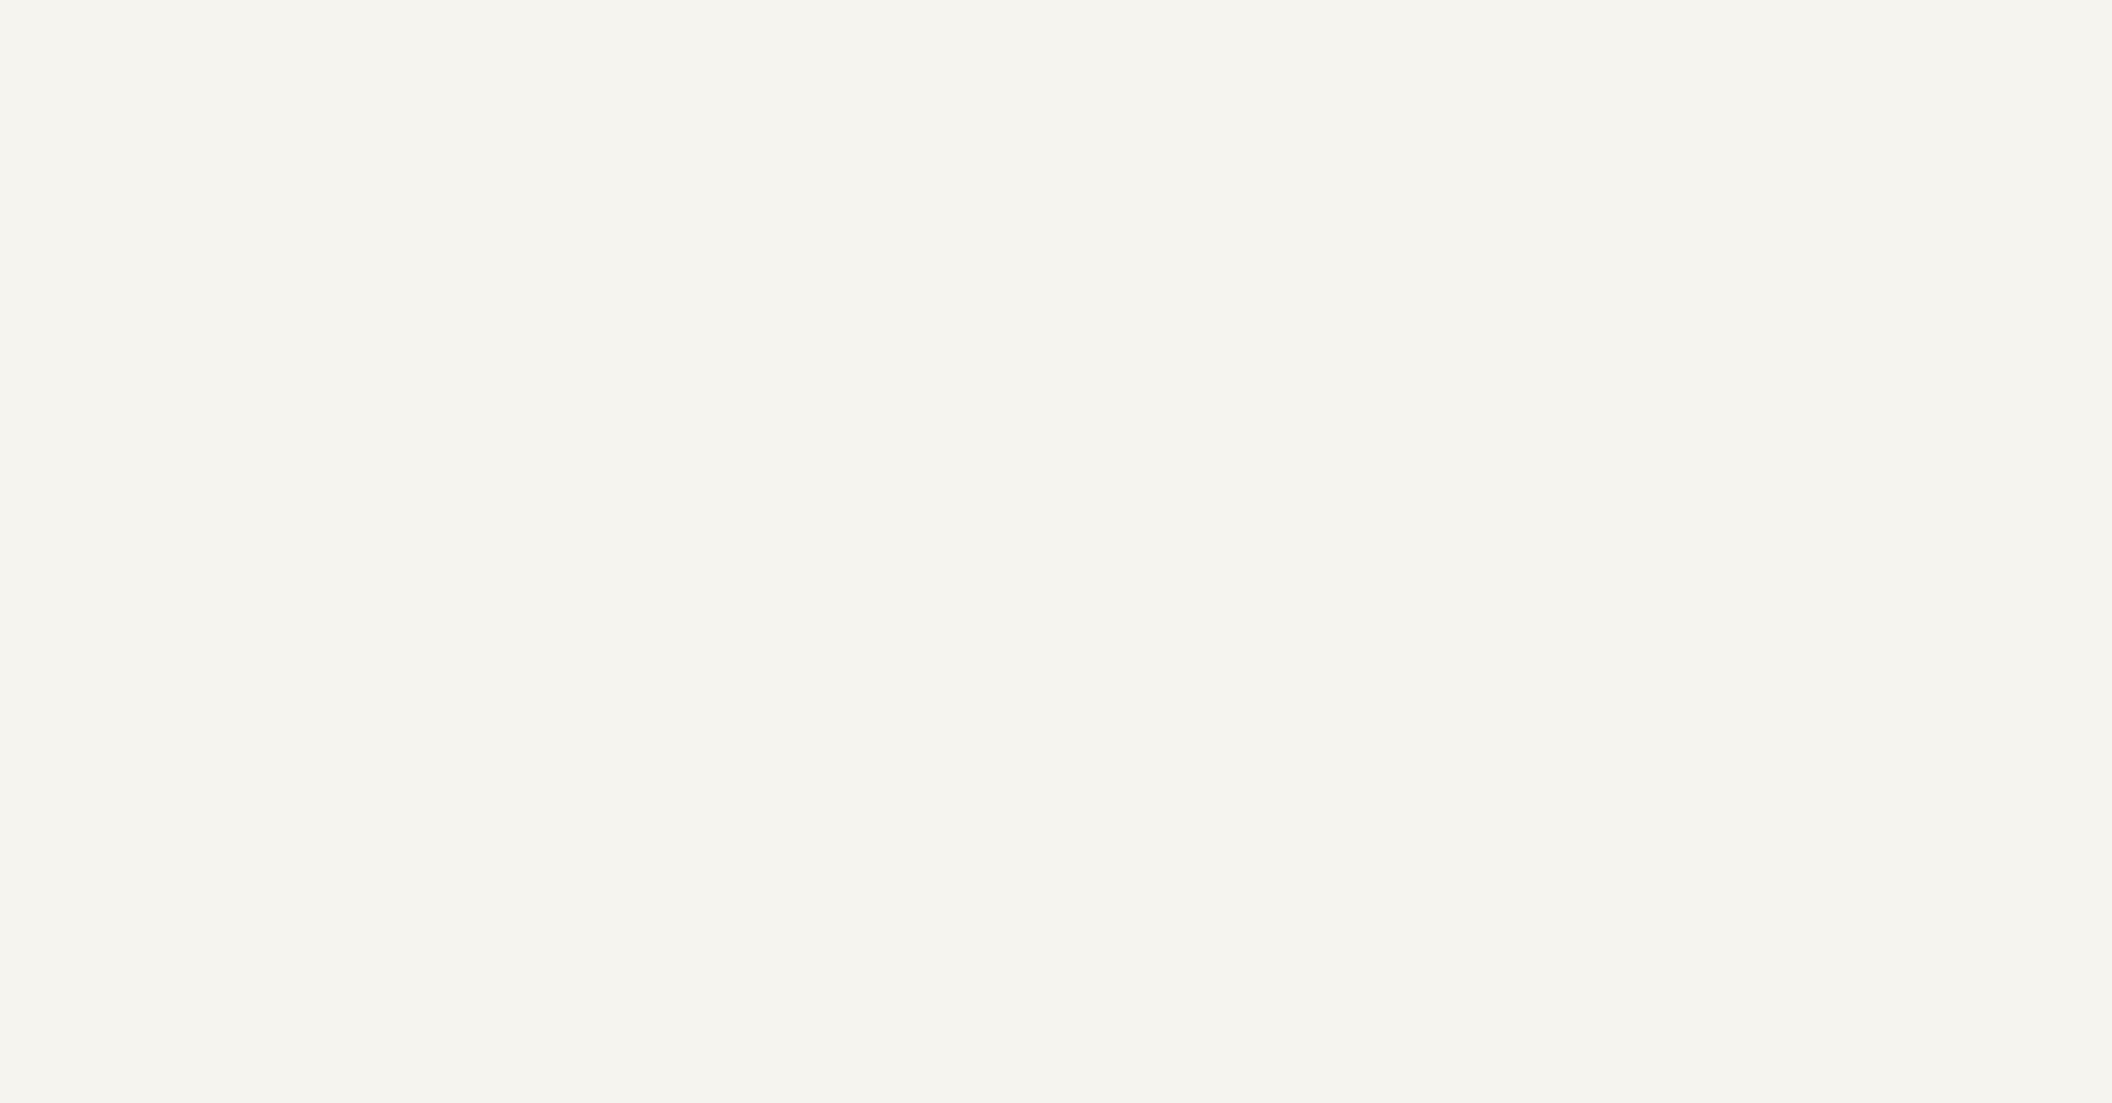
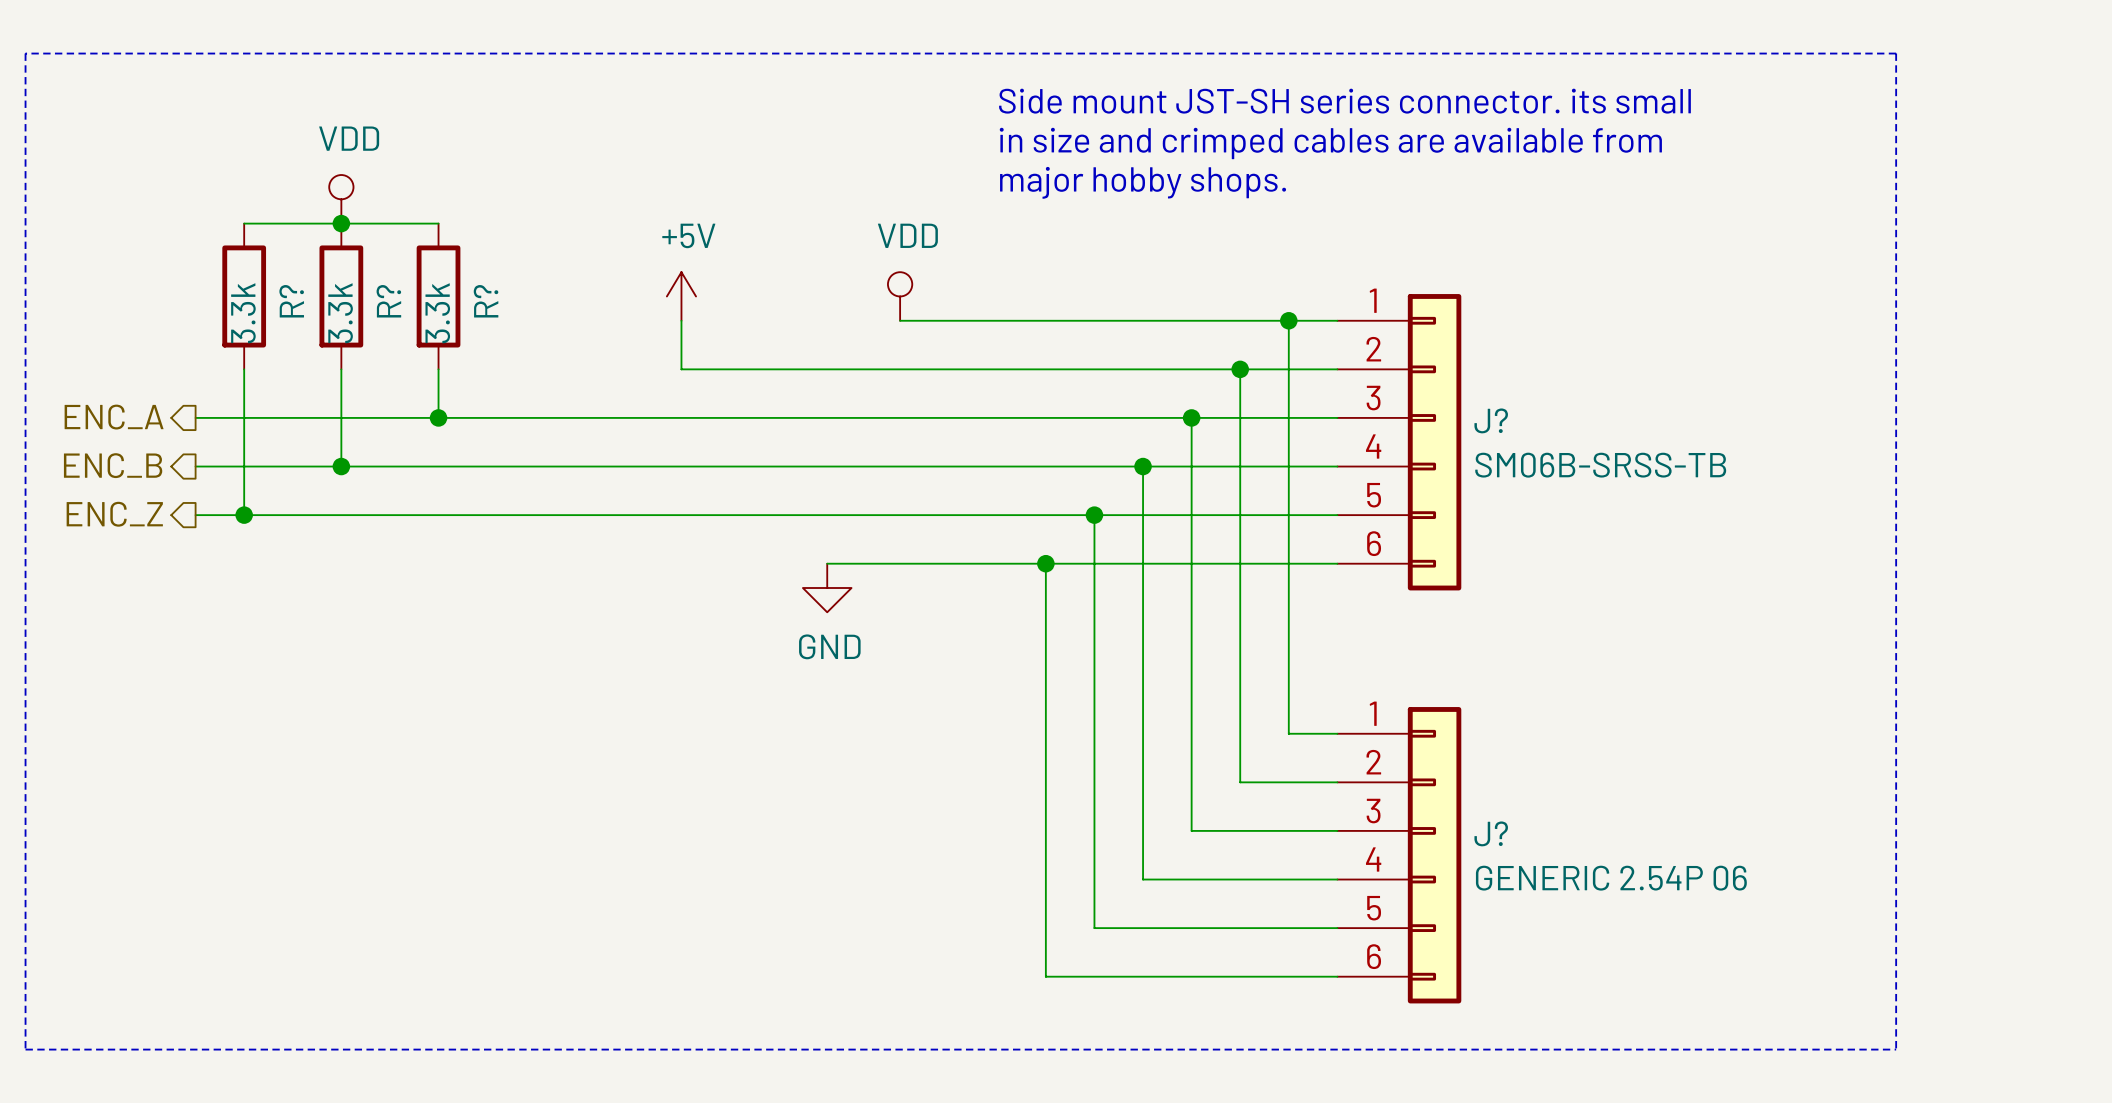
line: none -> (25, 53) (1896, 53) (1896, 1049) (25, 1049) (25, 53)
text: none -> Side mount JST-SH series connector. its small (1344, 101)
text: none -> in size and crimped cables are available from (1330, 143)
text: none -> major hobby shops. (1143, 182)
power symbol: none -> VDD (341, 199)
wire: none -> (244, 223) (438, 223)
junction: none -> (341, 223)
R?: none -> 3.3k (244, 296)
R?: none -> 3.3k (341, 296)
R?: none -> 3.3k (438, 296)
power symbol: none -> +5V (681, 296)
power symbol: none -> VDD (900, 296)
wire: none -> (681, 320) (681, 369) (1337, 369)
wire: none -> (900, 320) (1337, 320)
wire: none -> (1288, 320) (1288, 733) (1337, 733)
junction: none -> (1288, 320)
wire: none -> (244, 369) (244, 515)
wire: none -> (341, 369) (341, 466)
wire: none -> (438, 369) (438, 417)
wire: none -> (1240, 369) (1240, 782) (1337, 782)
junction: none -> (1240, 369)
hierarchical label: none -> ENC_A (114, 417)
wire: none -> (195, 417) (1337, 417)
junction: none -> (438, 417)
wire: none -> (1191, 417) (1191, 830) (1337, 830)
junction: none -> (1191, 417)
J?: none -> SM06B-SRSS-TB (1399, 442)
hierarchical label: none -> ENC_B (113, 465)
wire: none -> (195, 466) (1337, 466)
junction: none -> (341, 466)
wire: none -> (1143, 466) (1143, 879) (1337, 879)
junction: none -> (1143, 466)
hierarchical label: none -> ENC_Z (114, 514)
wire: none -> (195, 515) (1337, 515)
junction: none -> (244, 515)
wire: none -> (1094, 515) (1094, 928) (1337, 928)
junction: none -> (1094, 515)
wire: none -> (827, 563) (1337, 563)
wire: none -> (1045, 563) (1045, 976) (1337, 976)
junction: none -> (1045, 563)
power symbol: none -> GND (827, 588)
J?: none -> GENERIC 2.54P 06 (1399, 855)

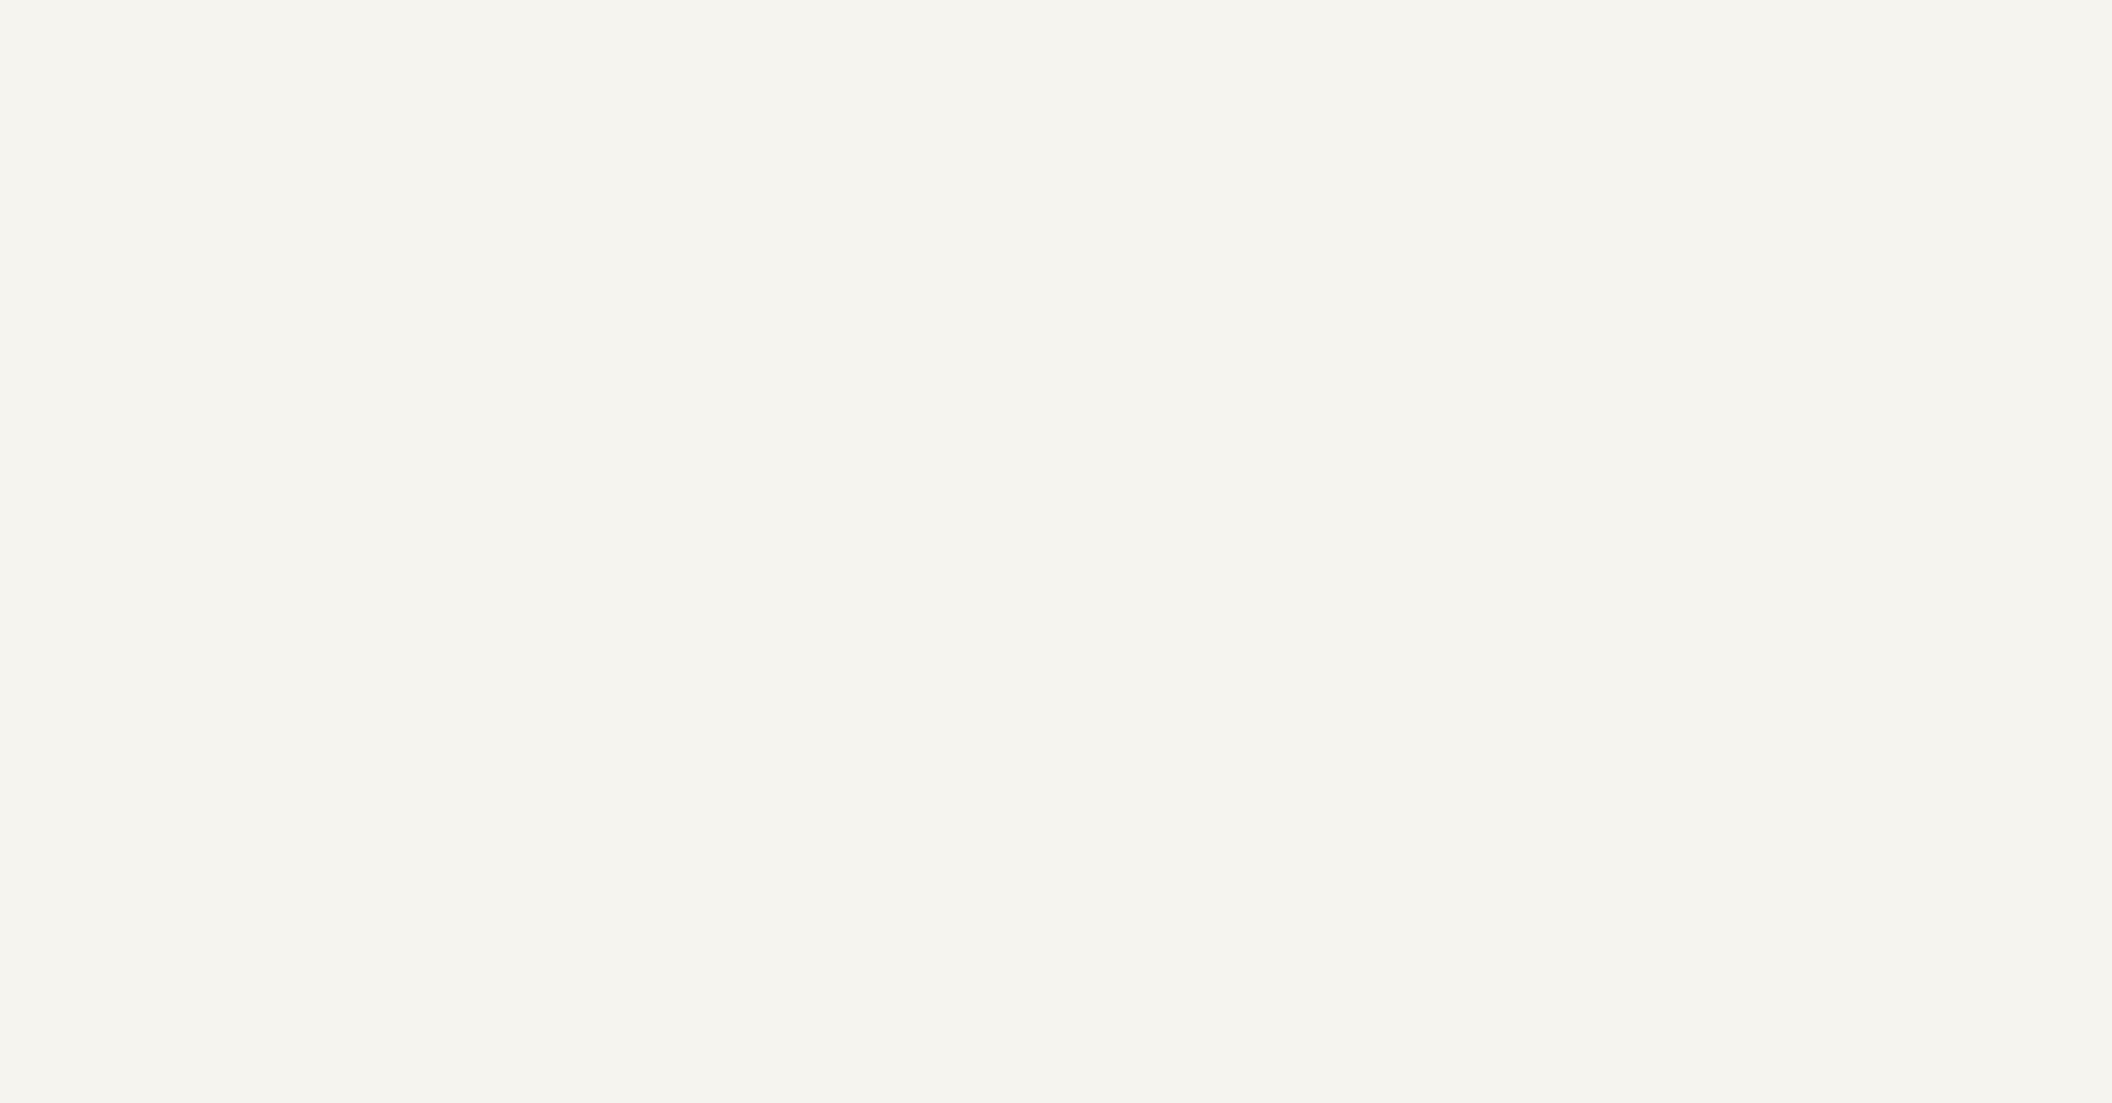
line: (25, 53) (1896, 53) (1896, 1049) (25, 1049) (25, 53) -> none
text: Side mount JST-SH series connector. its small (1344, 101) -> none
text: in size and crimped cables are available from (1330, 143) -> none
text: major hobby shops. (1143, 182) -> none
power symbol: VDD (341, 199) -> none
wire: (244, 223) (438, 223) -> none
junction: (341, 223) -> none
R?: 3.3k (244, 296) -> none
R?: 3.3k (341, 296) -> none
R?: 3.3k (438, 296) -> none
power symbol: +5V (681, 296) -> none
power symbol: VDD (900, 296) -> none
wire: (681, 320) (681, 369) (1337, 369) -> none
wire: (900, 320) (1337, 320) -> none
wire: (1288, 320) (1288, 733) (1337, 733) -> none
junction: (1288, 320) -> none
wire: (244, 369) (244, 515) -> none
wire: (341, 369) (341, 466) -> none
wire: (438, 369) (438, 417) -> none
wire: (1240, 369) (1240, 782) (1337, 782) -> none
junction: (1240, 369) -> none
hierarchical label: ENC_A (114, 417) -> none
wire: (195, 417) (1337, 417) -> none
junction: (438, 417) -> none
wire: (1191, 417) (1191, 830) (1337, 830) -> none
junction: (1191, 417) -> none
J?: SM06B-SRSS-TB (1399, 442) -> none
hierarchical label: ENC_B (113, 465) -> none
wire: (195, 466) (1337, 466) -> none
junction: (341, 466) -> none
wire: (1143, 466) (1143, 879) (1337, 879) -> none
junction: (1143, 466) -> none
hierarchical label: ENC_Z (114, 514) -> none
wire: (195, 515) (1337, 515) -> none
junction: (244, 515) -> none
wire: (1094, 515) (1094, 928) (1337, 928) -> none
junction: (1094, 515) -> none
wire: (827, 563) (1337, 563) -> none
wire: (1045, 563) (1045, 976) (1337, 976) -> none
junction: (1045, 563) -> none
power symbol: GND (827, 588) -> none
J?: GENERIC 2.54P 06 (1399, 855) -> none

